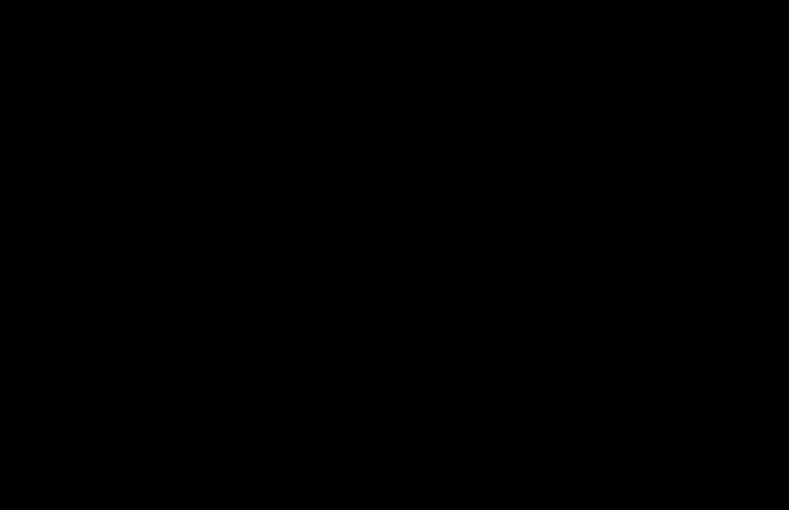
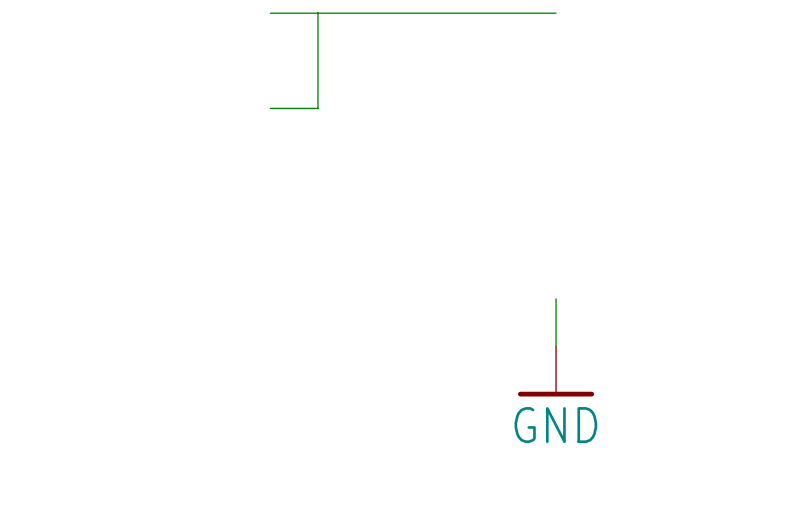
wire: none -> (270, 13) (556, 13)
wire: none -> (317, 13) (317, 108) (270, 108)
wire: none -> (556, 298) (556, 346)
power symbol: none -> GND (556, 371)

